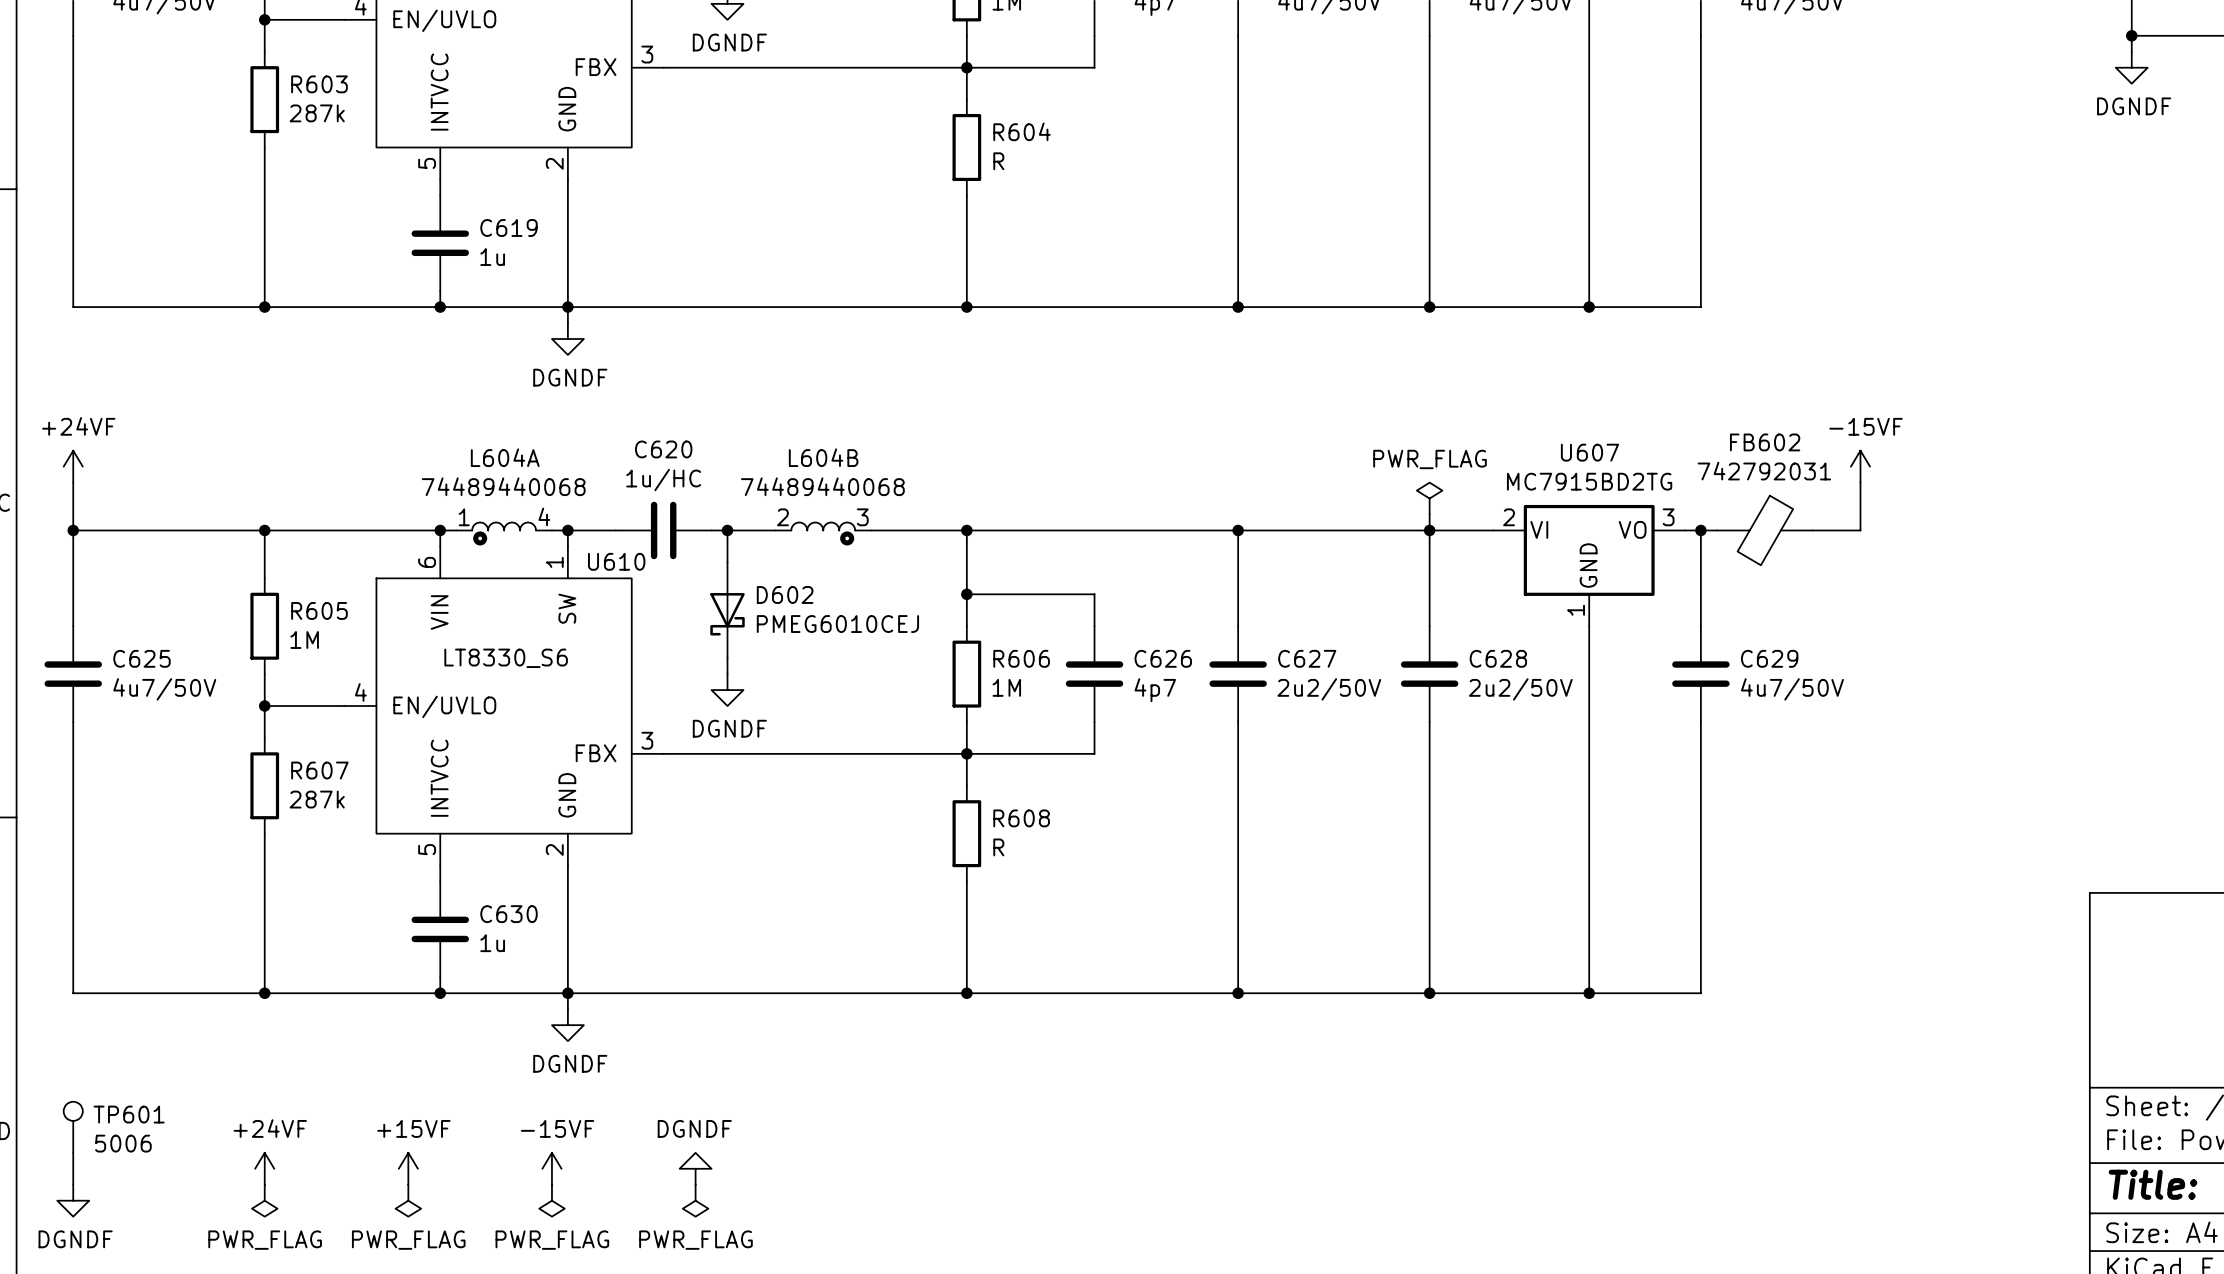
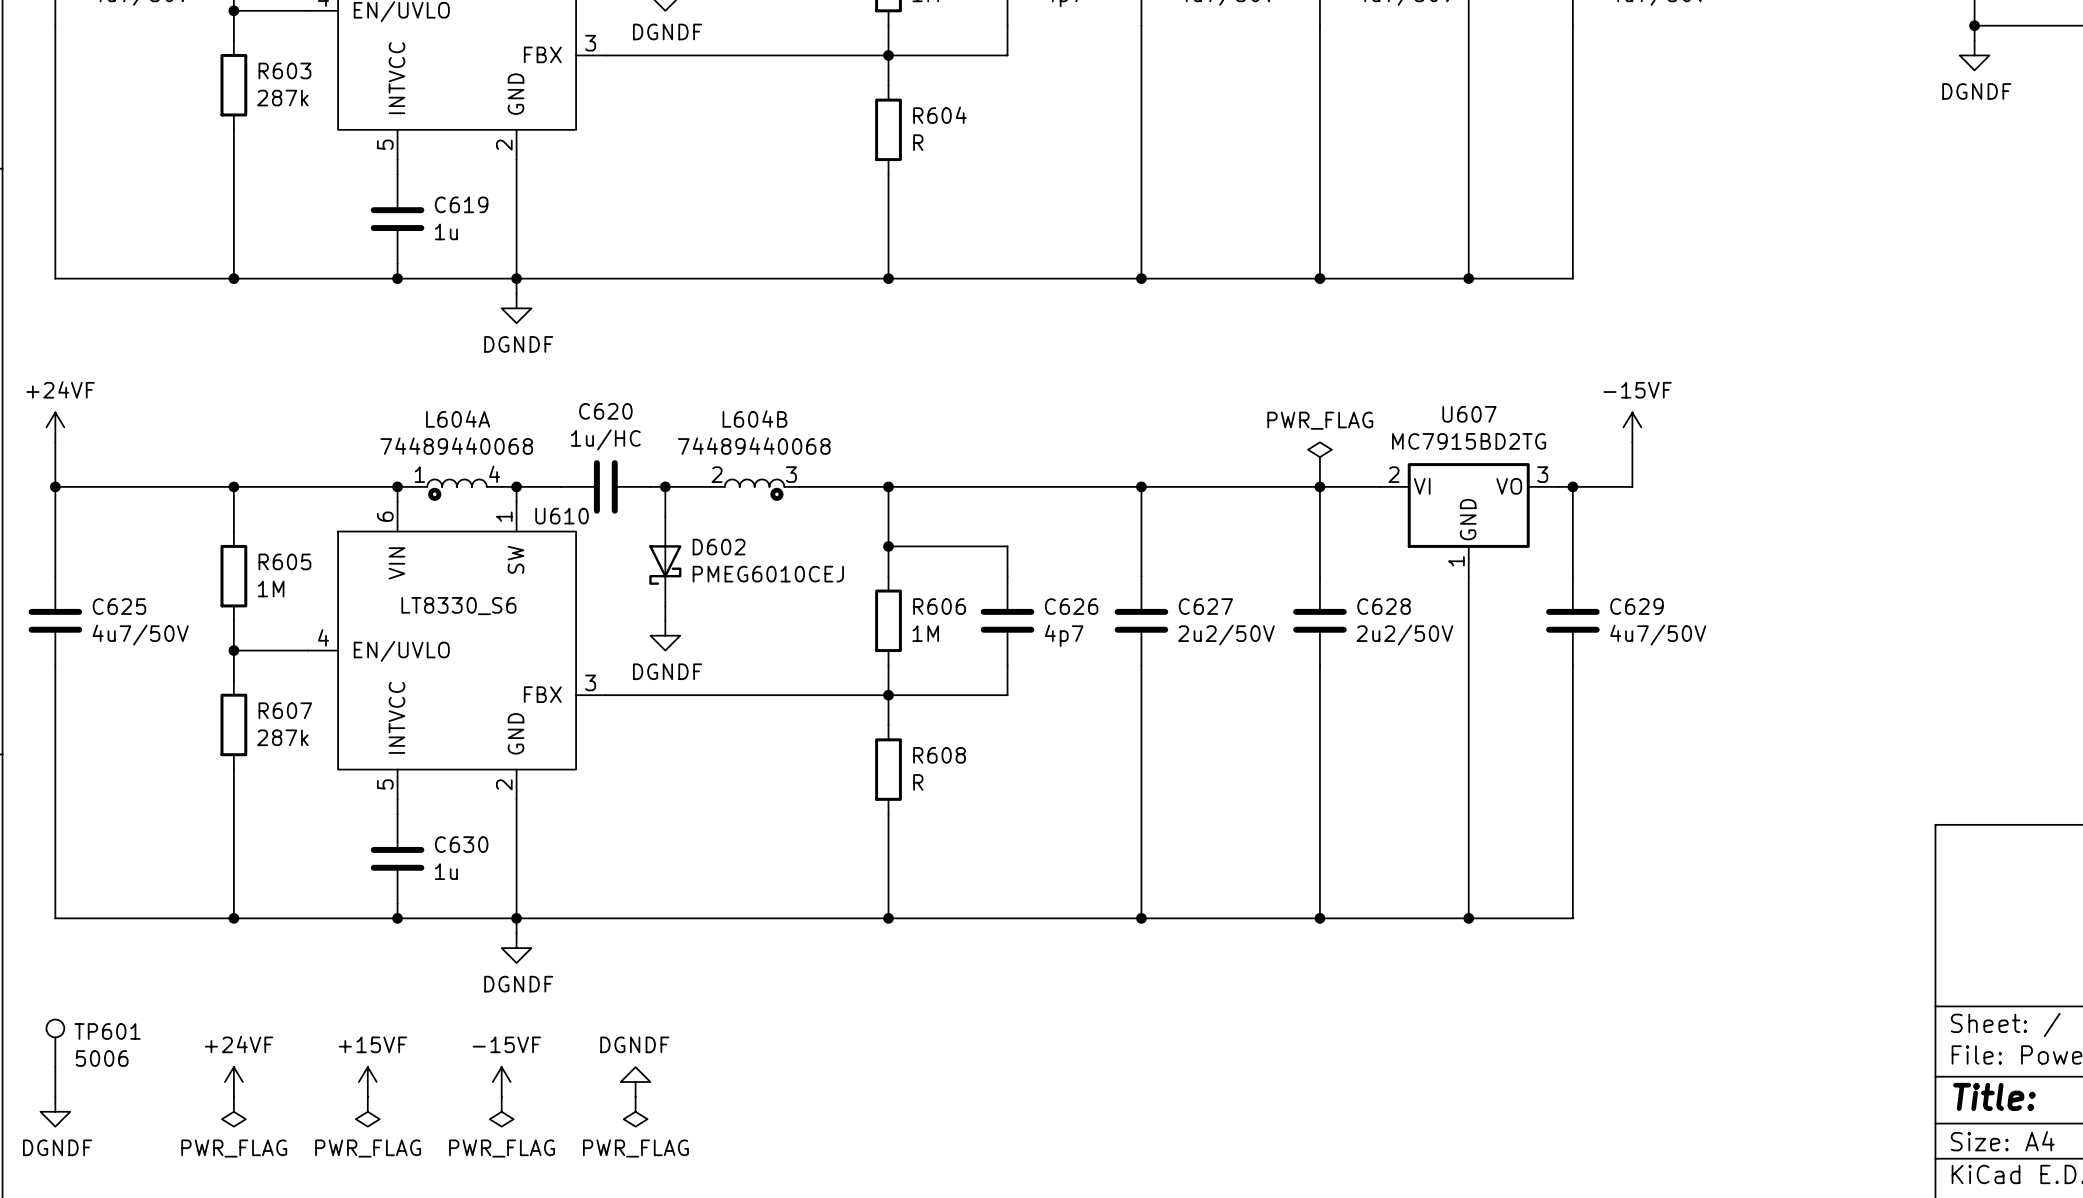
power symbol position: -15VF (1860, 466) -> -15VF (1632, 427)
wire: (1860, 482) (1860, 530) (1812, 530) -> (1632, 442) (1632, 486) (1587, 486)
FB602: 742792031 (1764, 530) -> none

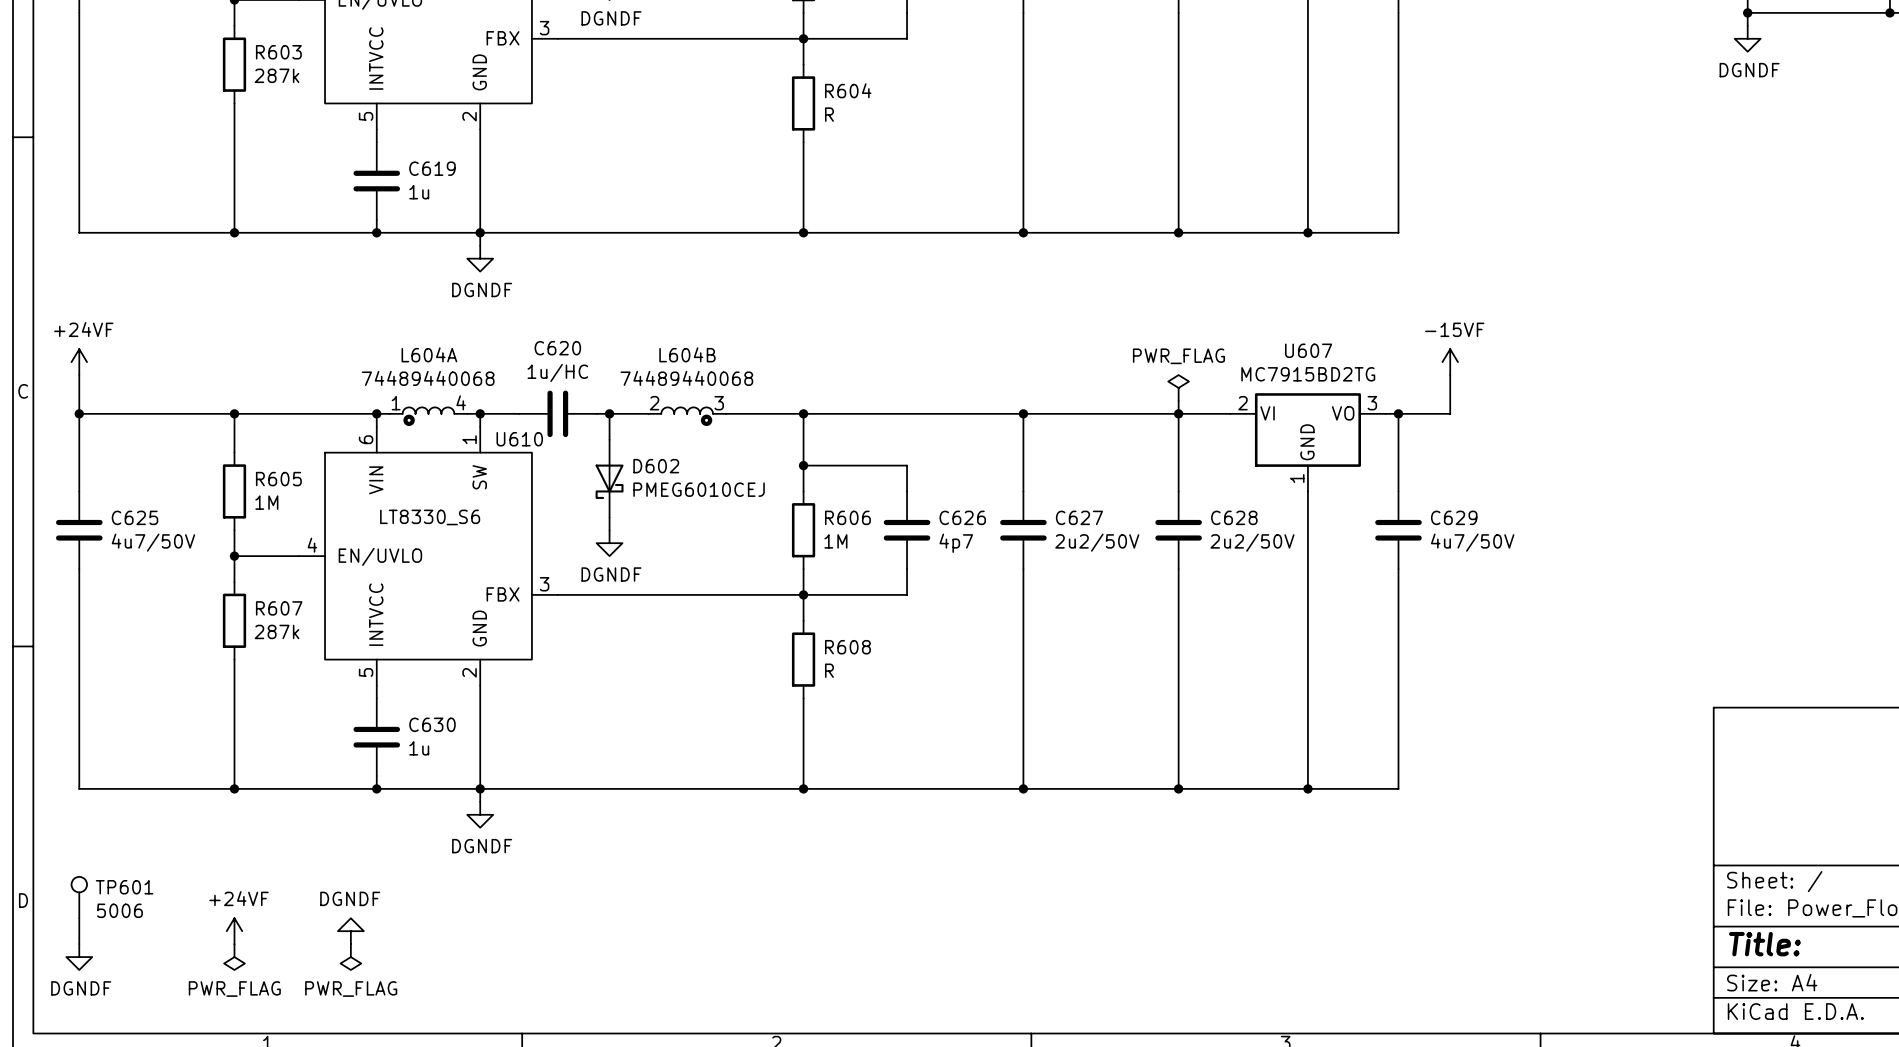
power symbol: +15VF (367, 1082) -> DGNDF (350, 931)
power symbol: -15VF (501, 1082) -> none
power symbol: DGNDF (635, 1082) -> none
power symbol: PWR_FLAG (501, 1111) -> none
power symbol: PWR_FLAG (635, 1111) -> none

